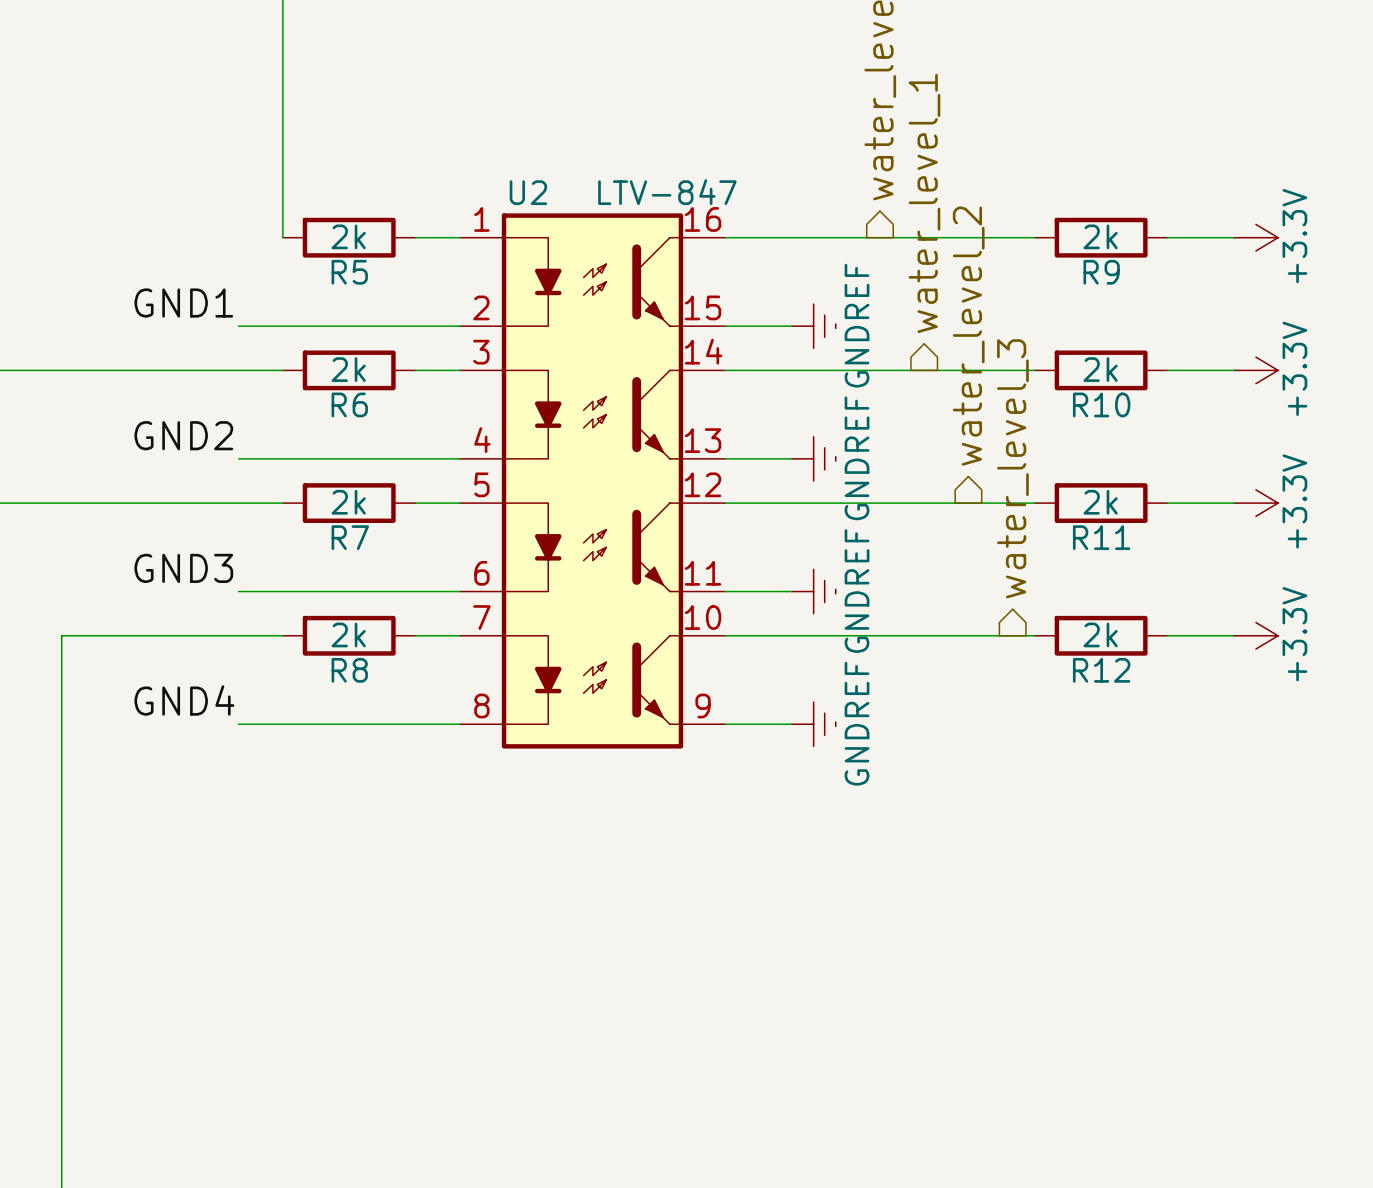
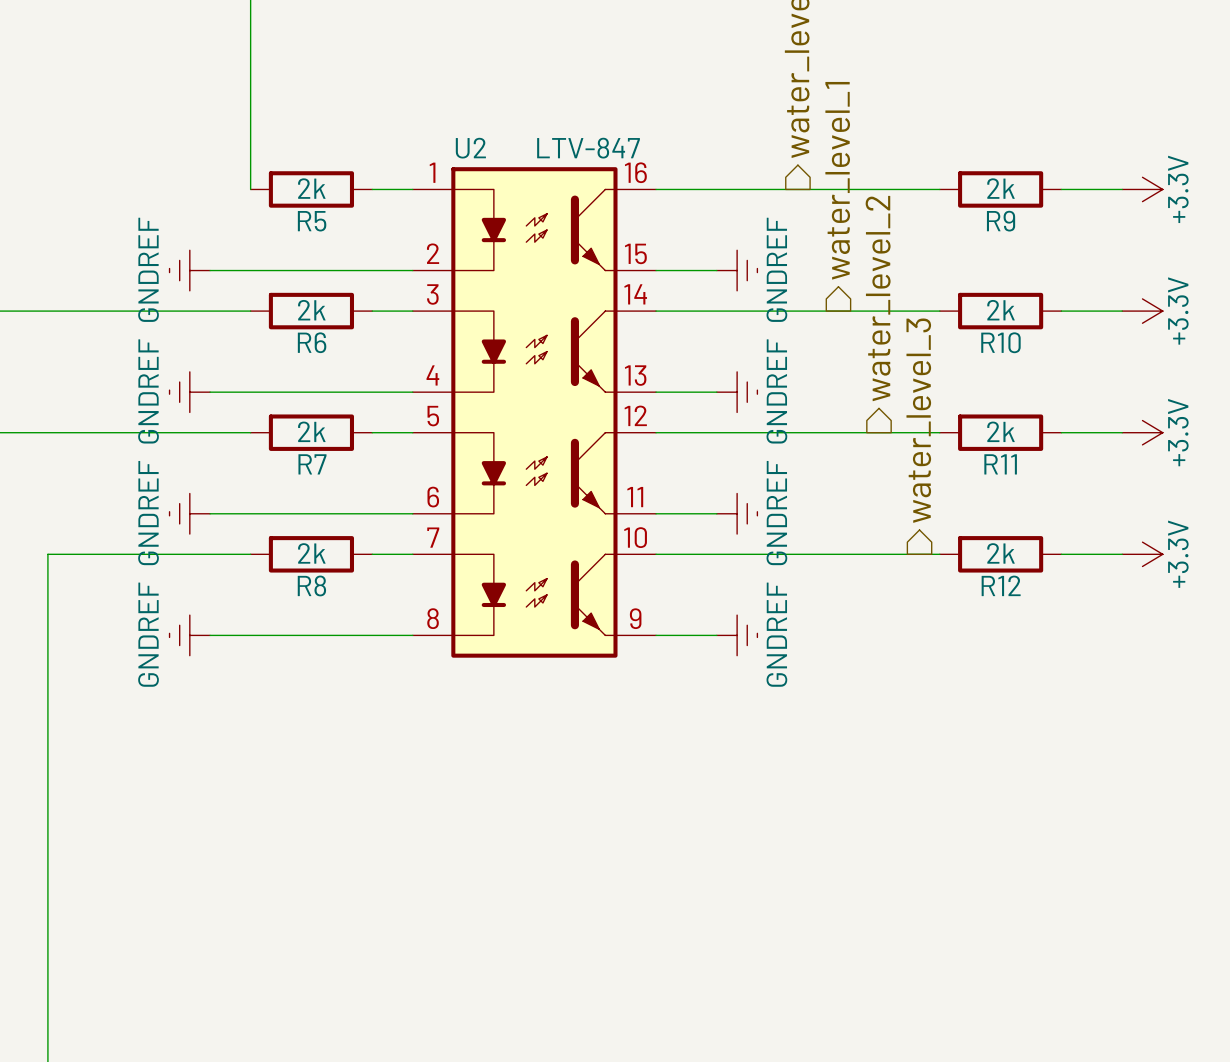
label: GND1 (183, 303) -> none
power symbol: none -> GNDREF (189, 270)
label: GND2 (183, 435) -> none
power symbol: none -> GNDREF (189, 392)
label: GND3 (183, 568) -> none
power symbol: none -> GNDREF (189, 513)
label: GND4 (184, 700) -> none
power symbol: none -> GNDREF (189, 635)

